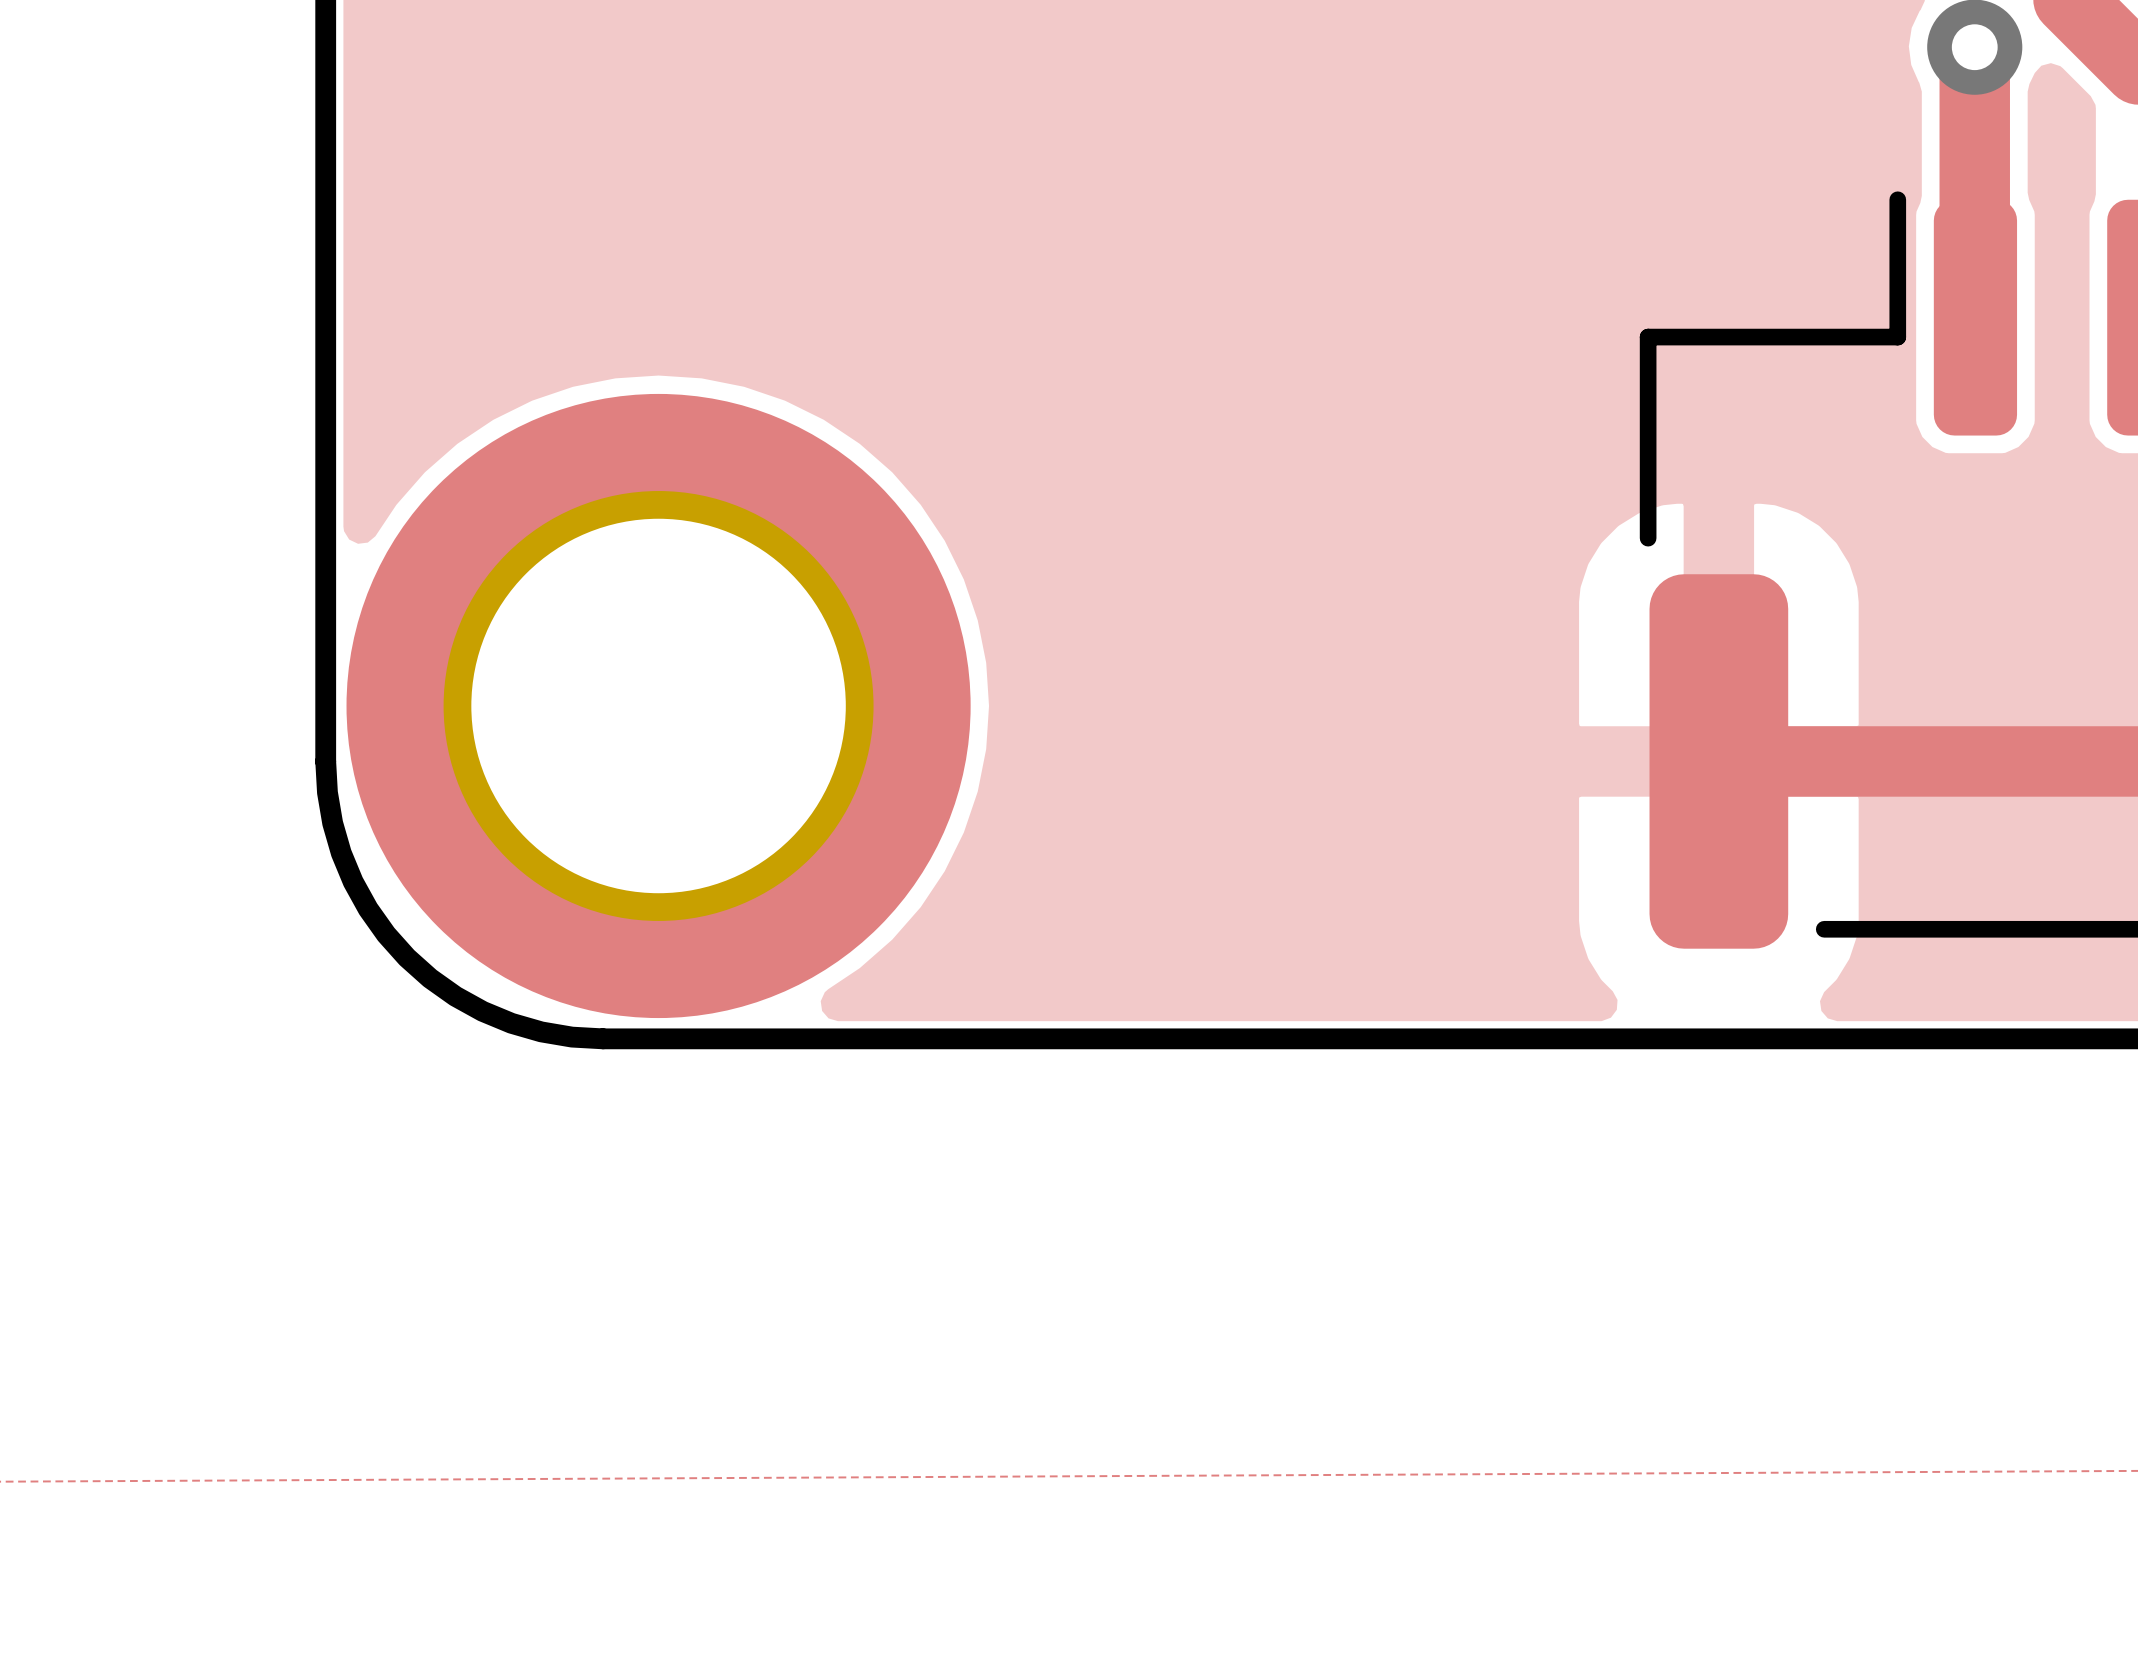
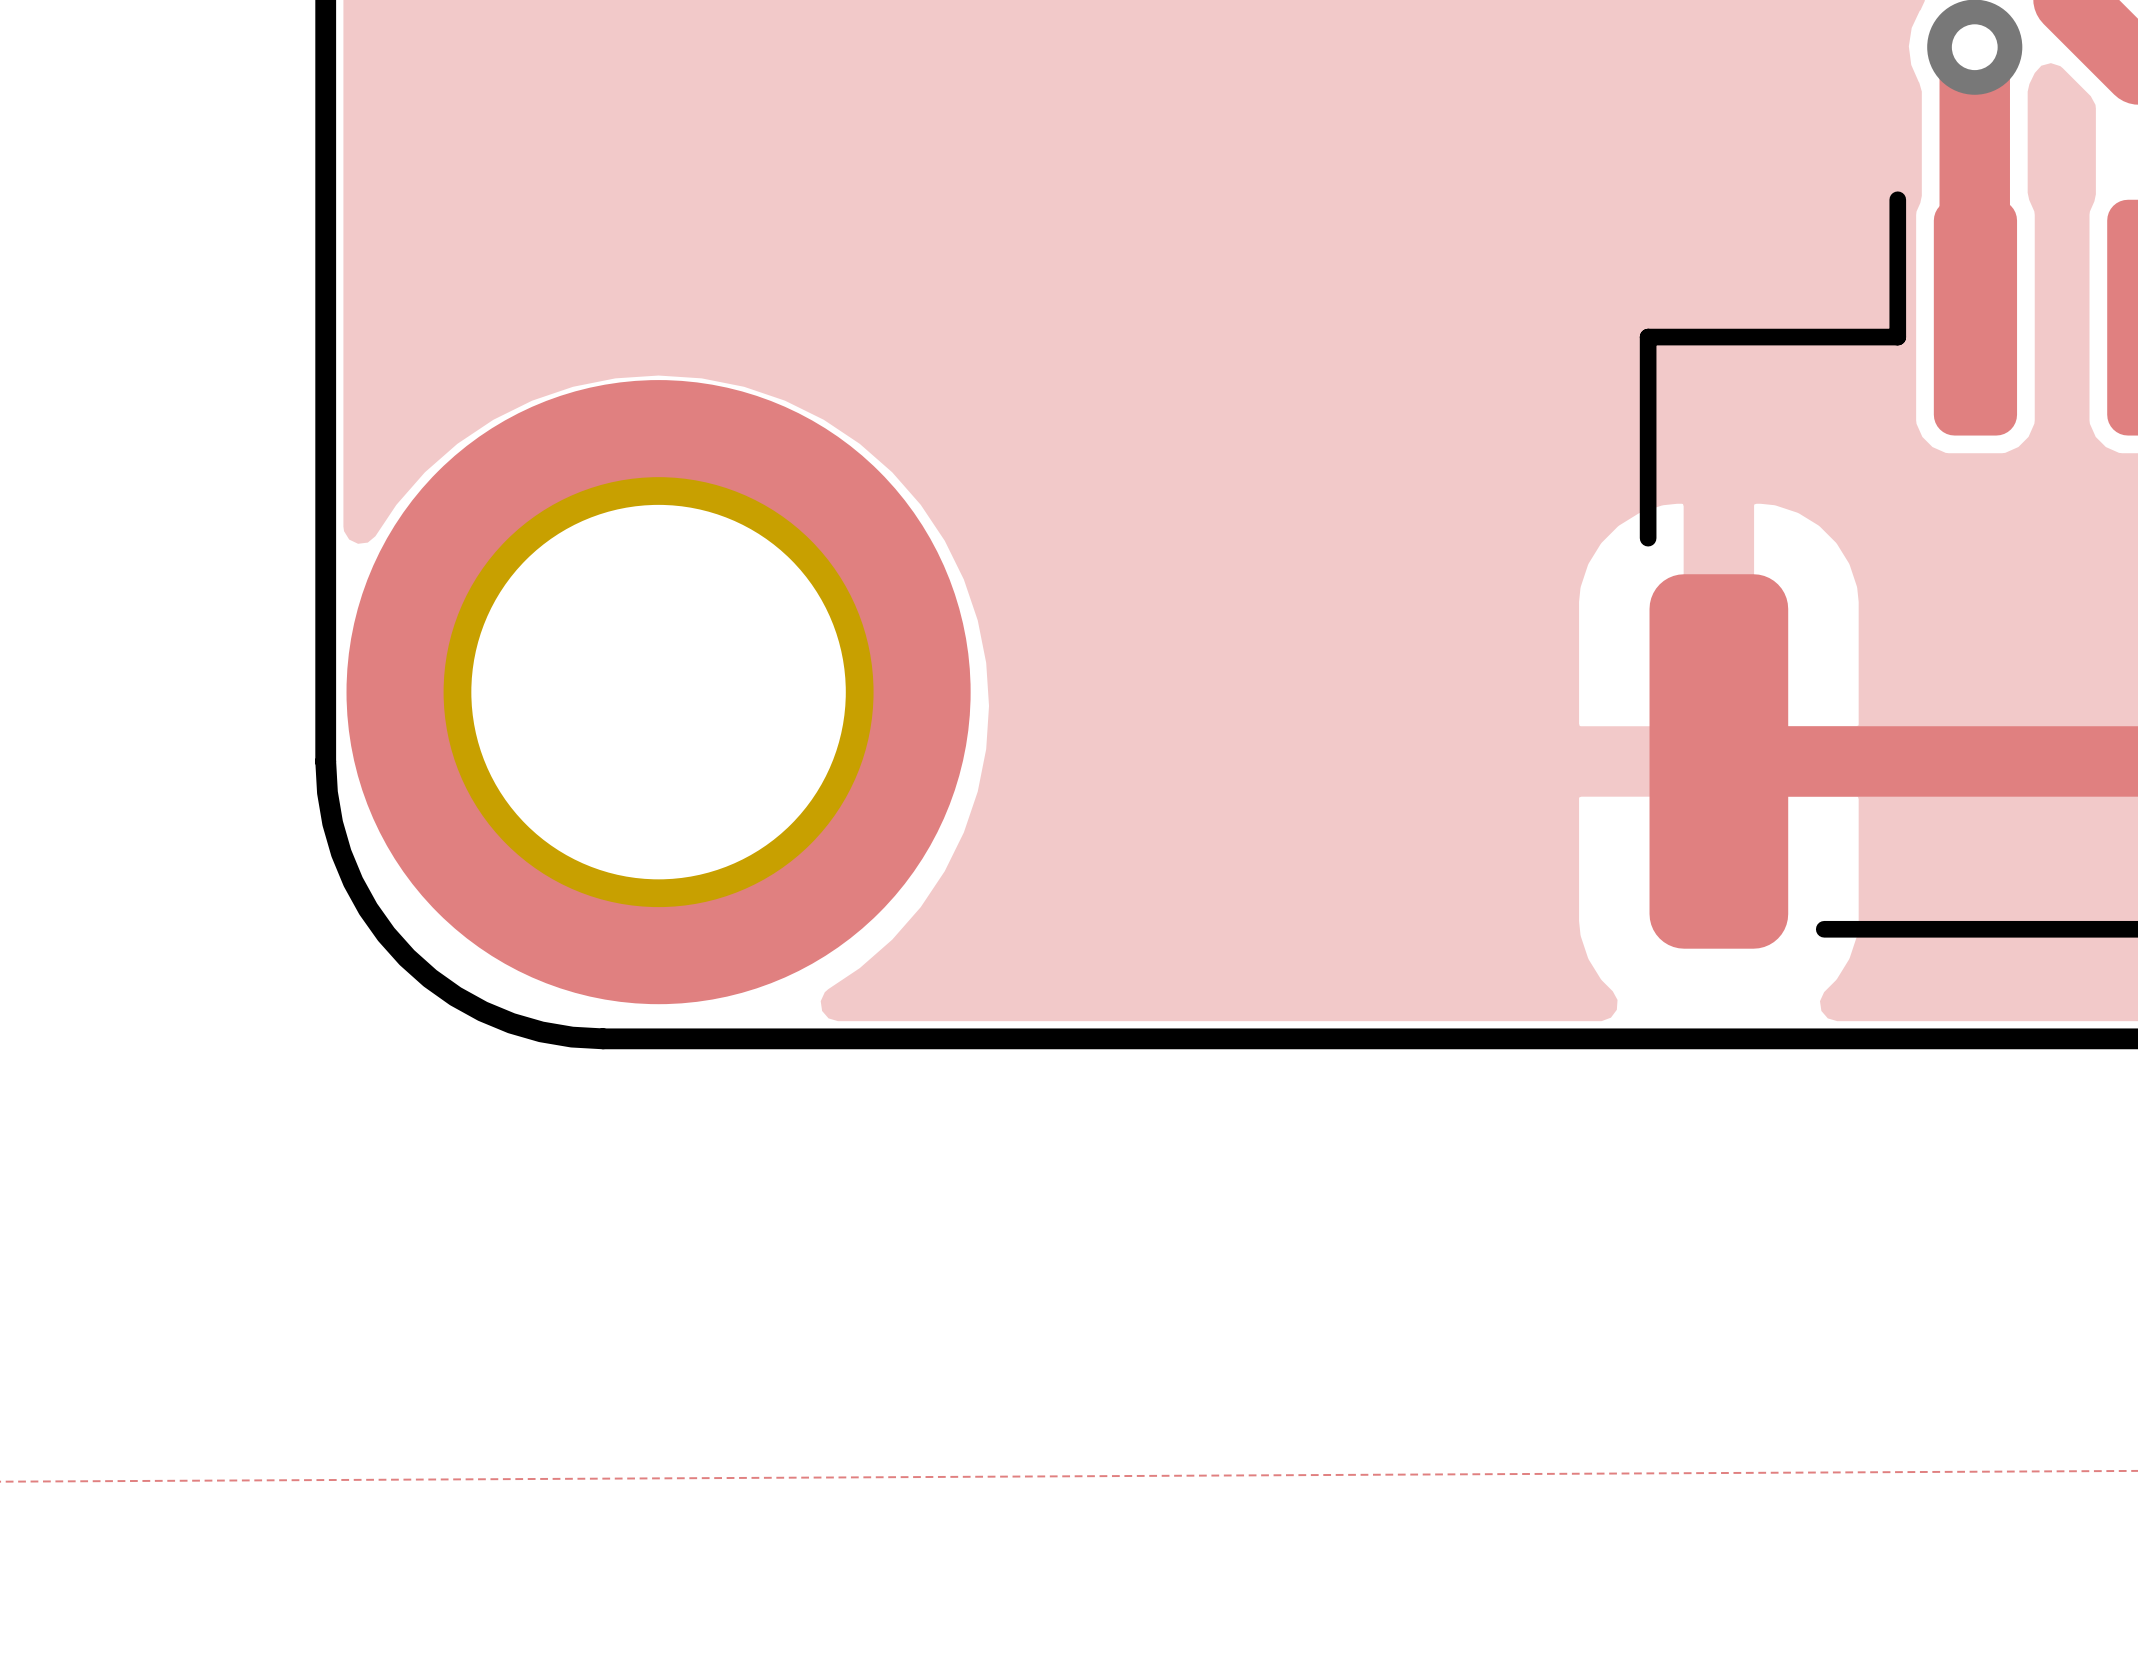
part position: (658, 705) -> (658, 692)

